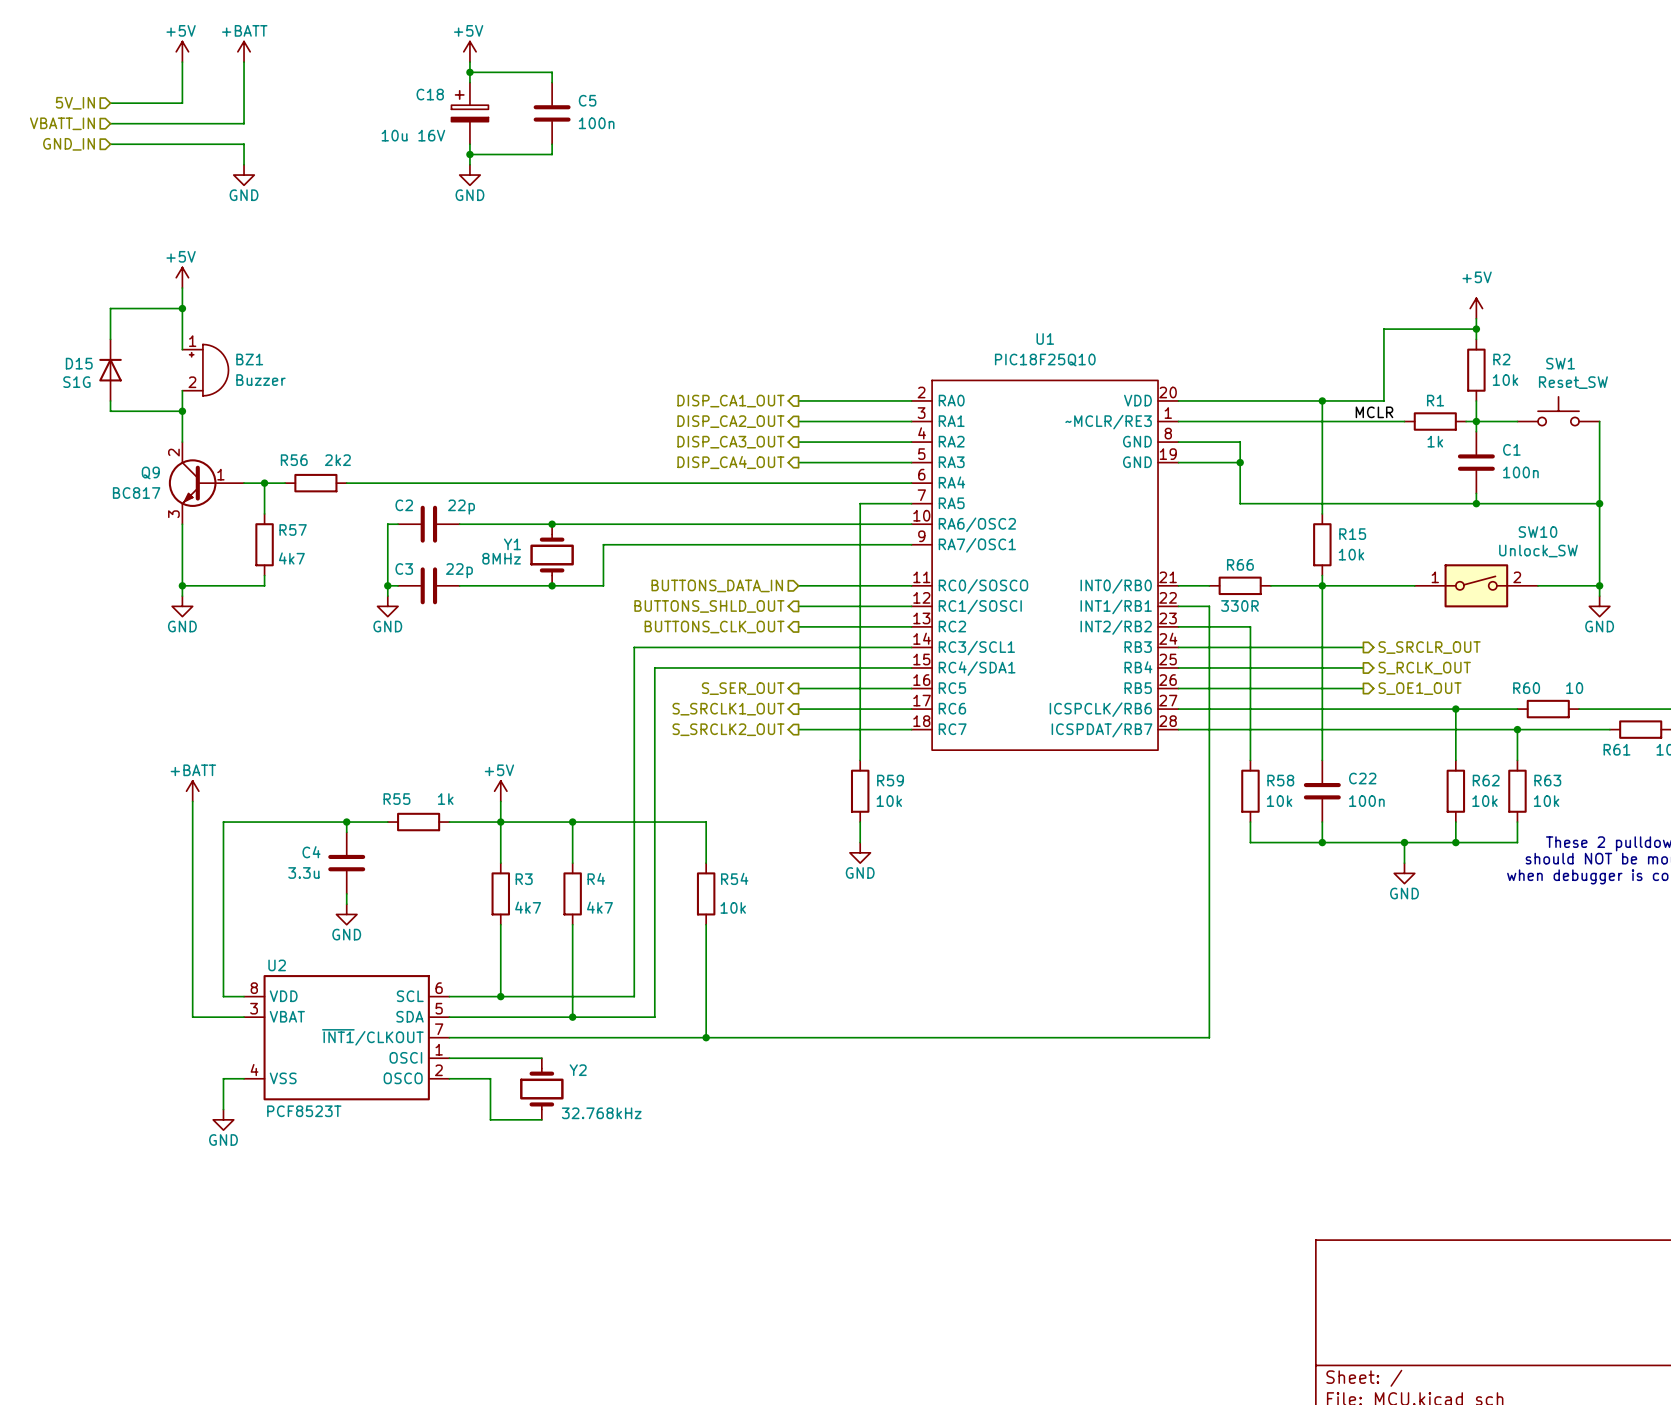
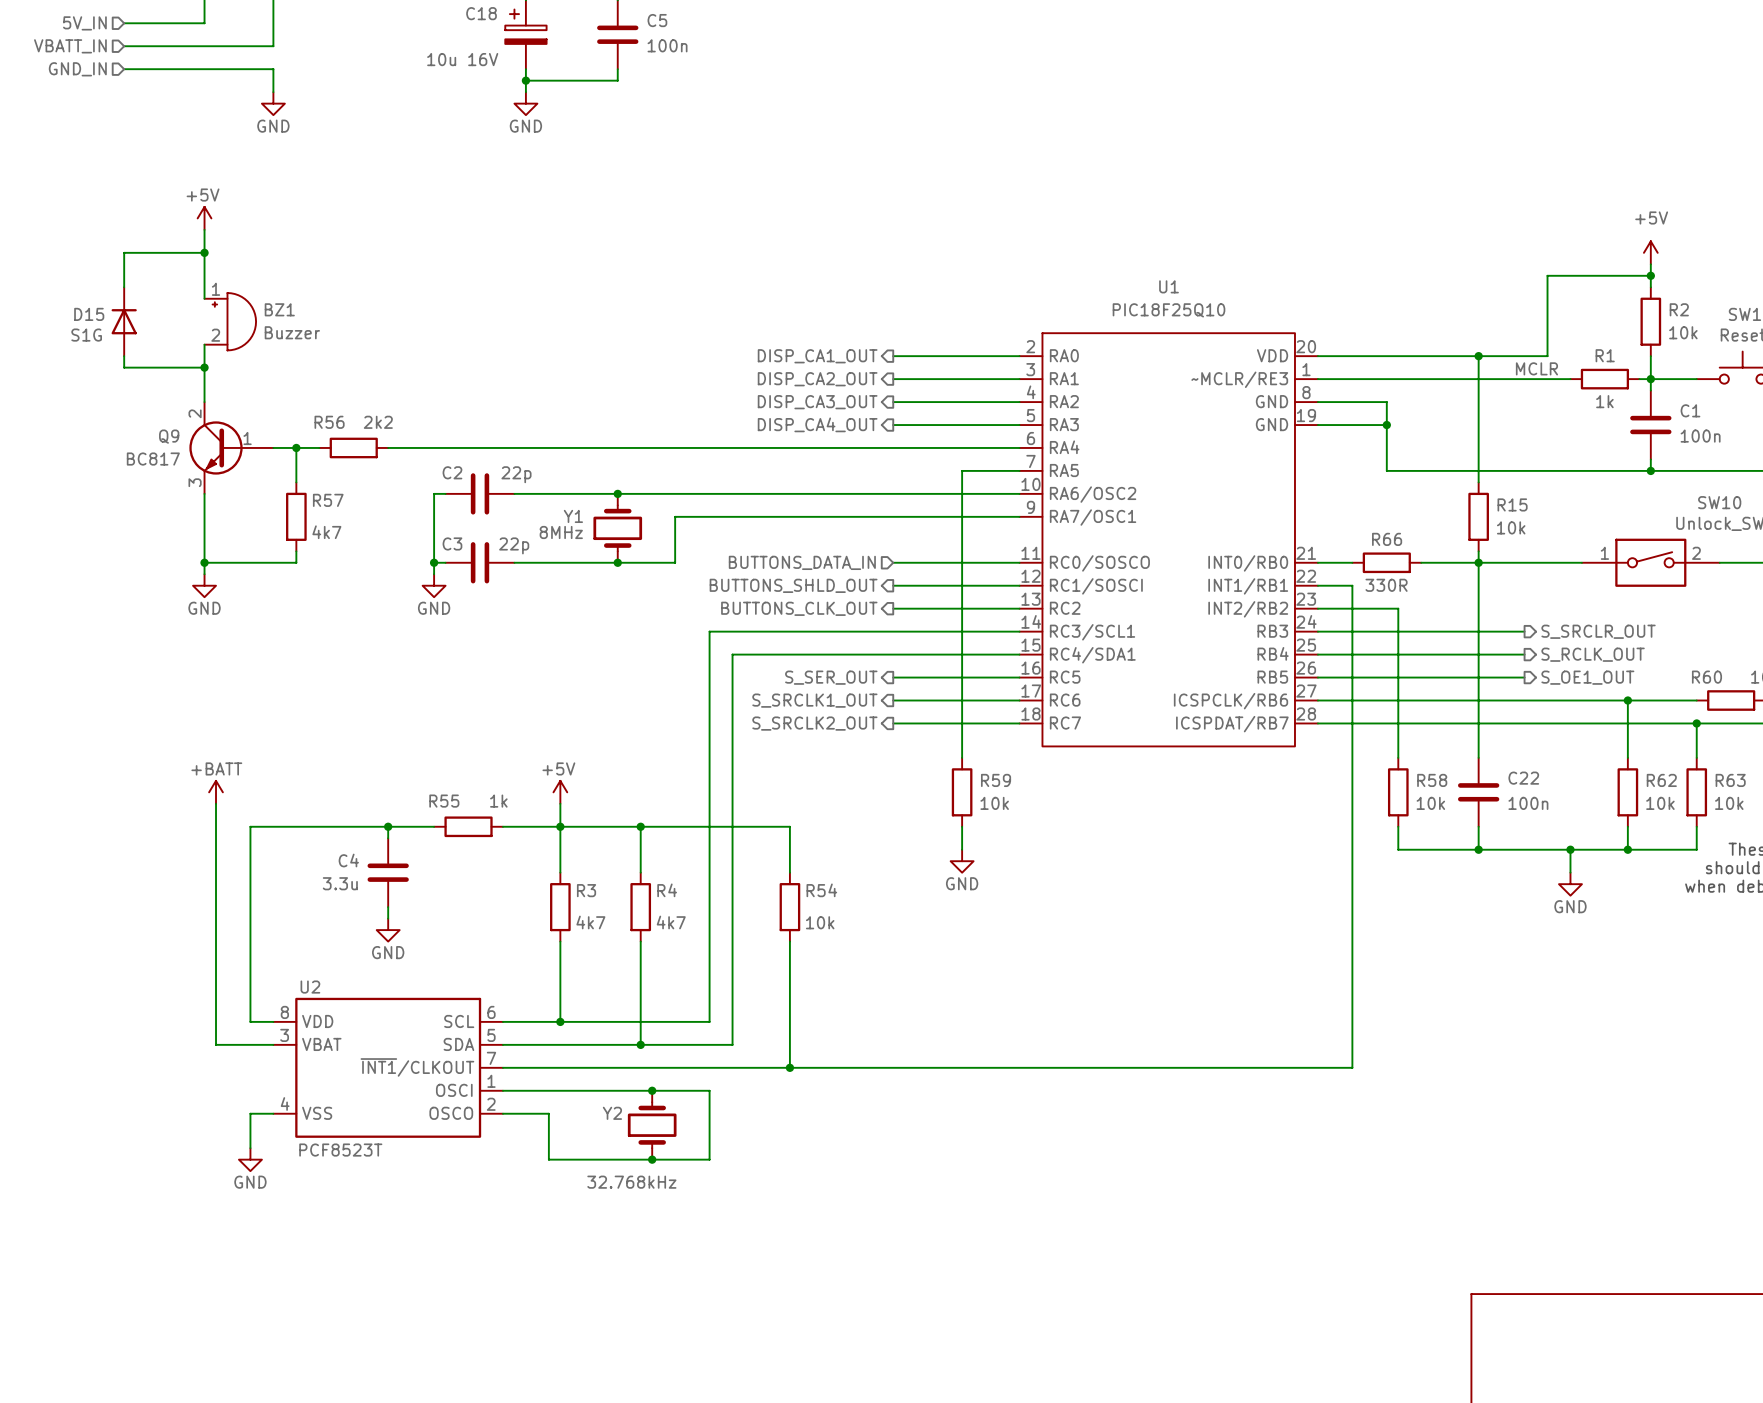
wire: none -> (606, 1090) (709, 1090) (709, 1159) (606, 1159)
junction: none -> (652, 1090)
Y2 name position: Y2 (578, 1070) -> Y2 (612, 1113)
Y2 position: (541, 1089) -> (652, 1125)
Y2 value position: 32.768kHz (601, 1113) -> 32.768kHz (631, 1182)
junction: none -> (652, 1159)

